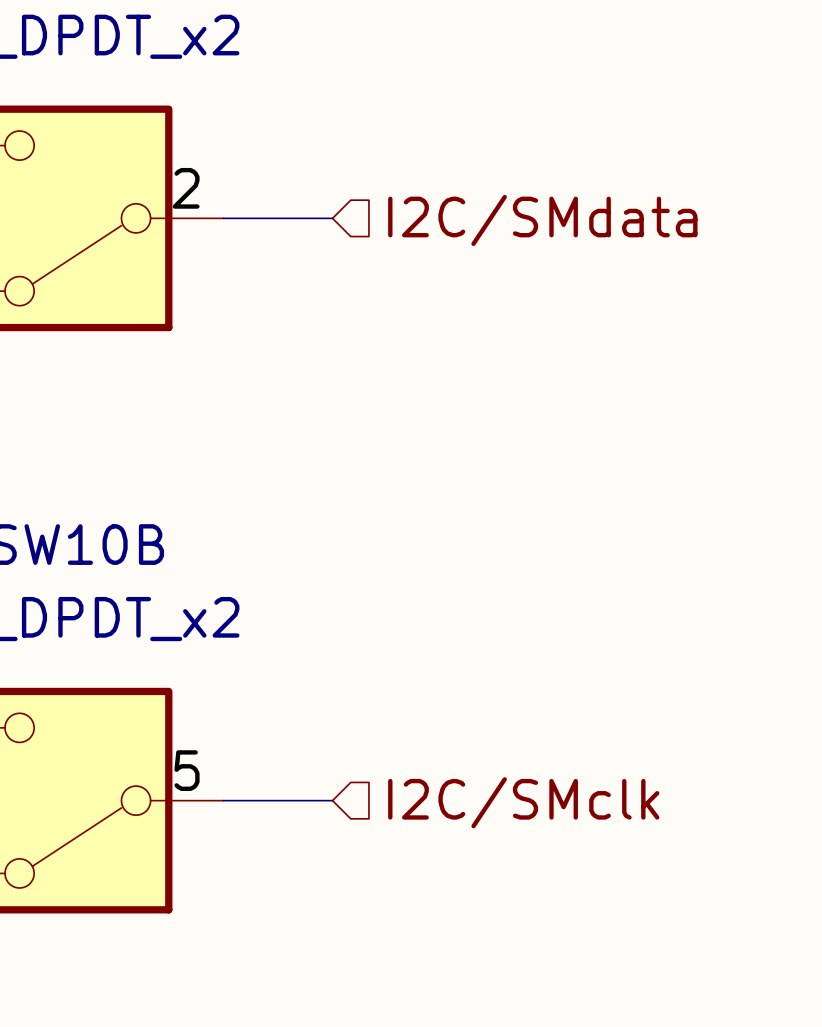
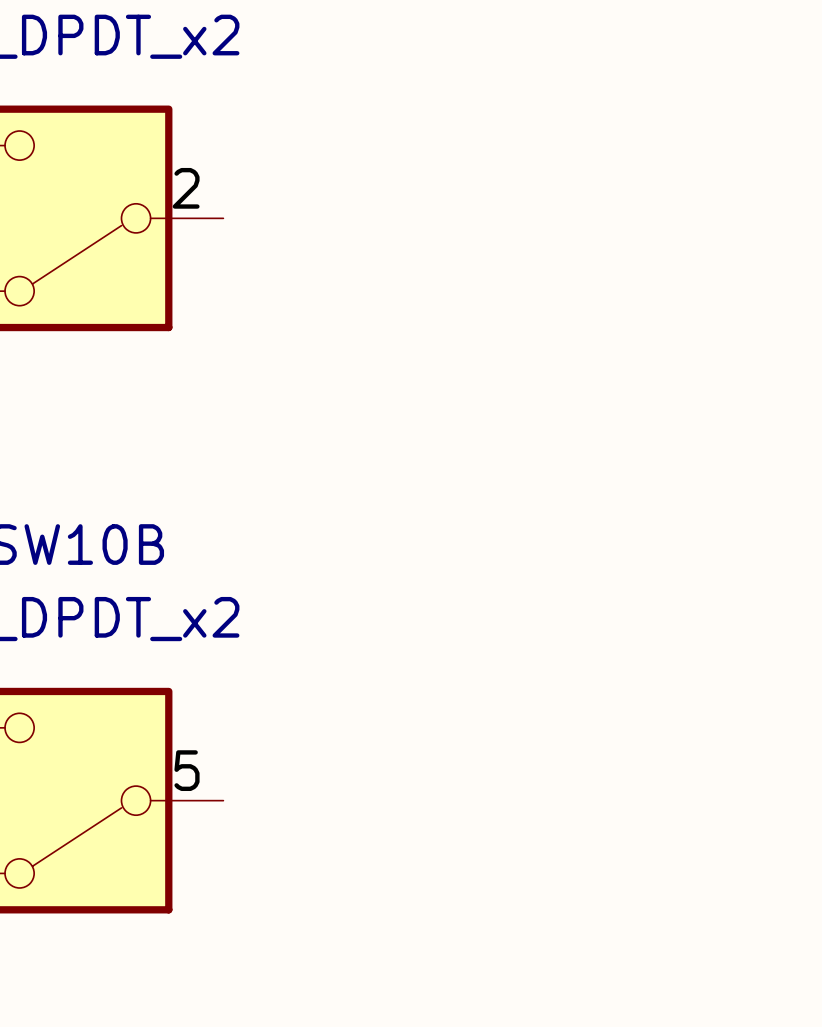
wire: (223, 218) (332, 218) -> none
hierarchical label: I2C/SMdata (542, 220) -> none
wire: (223, 800) (332, 800) -> none
hierarchical label: I2C/SMclk (523, 802) -> none

